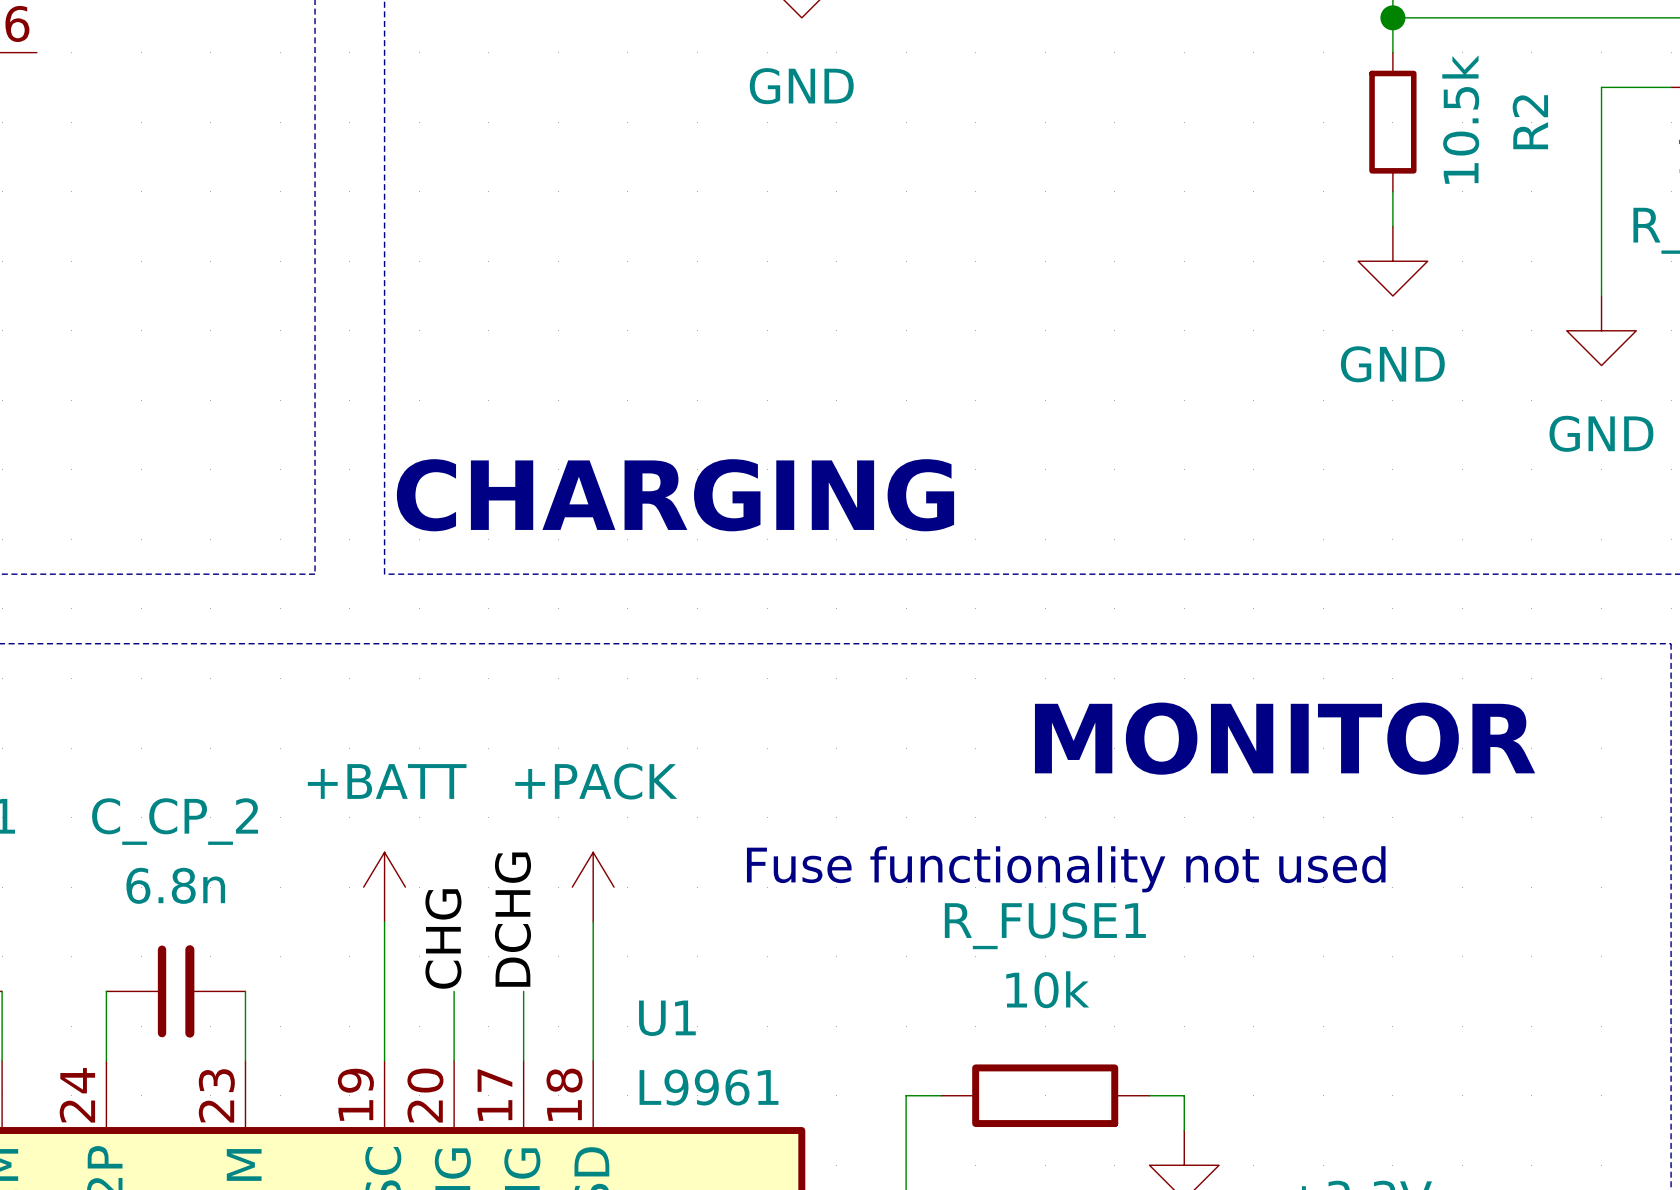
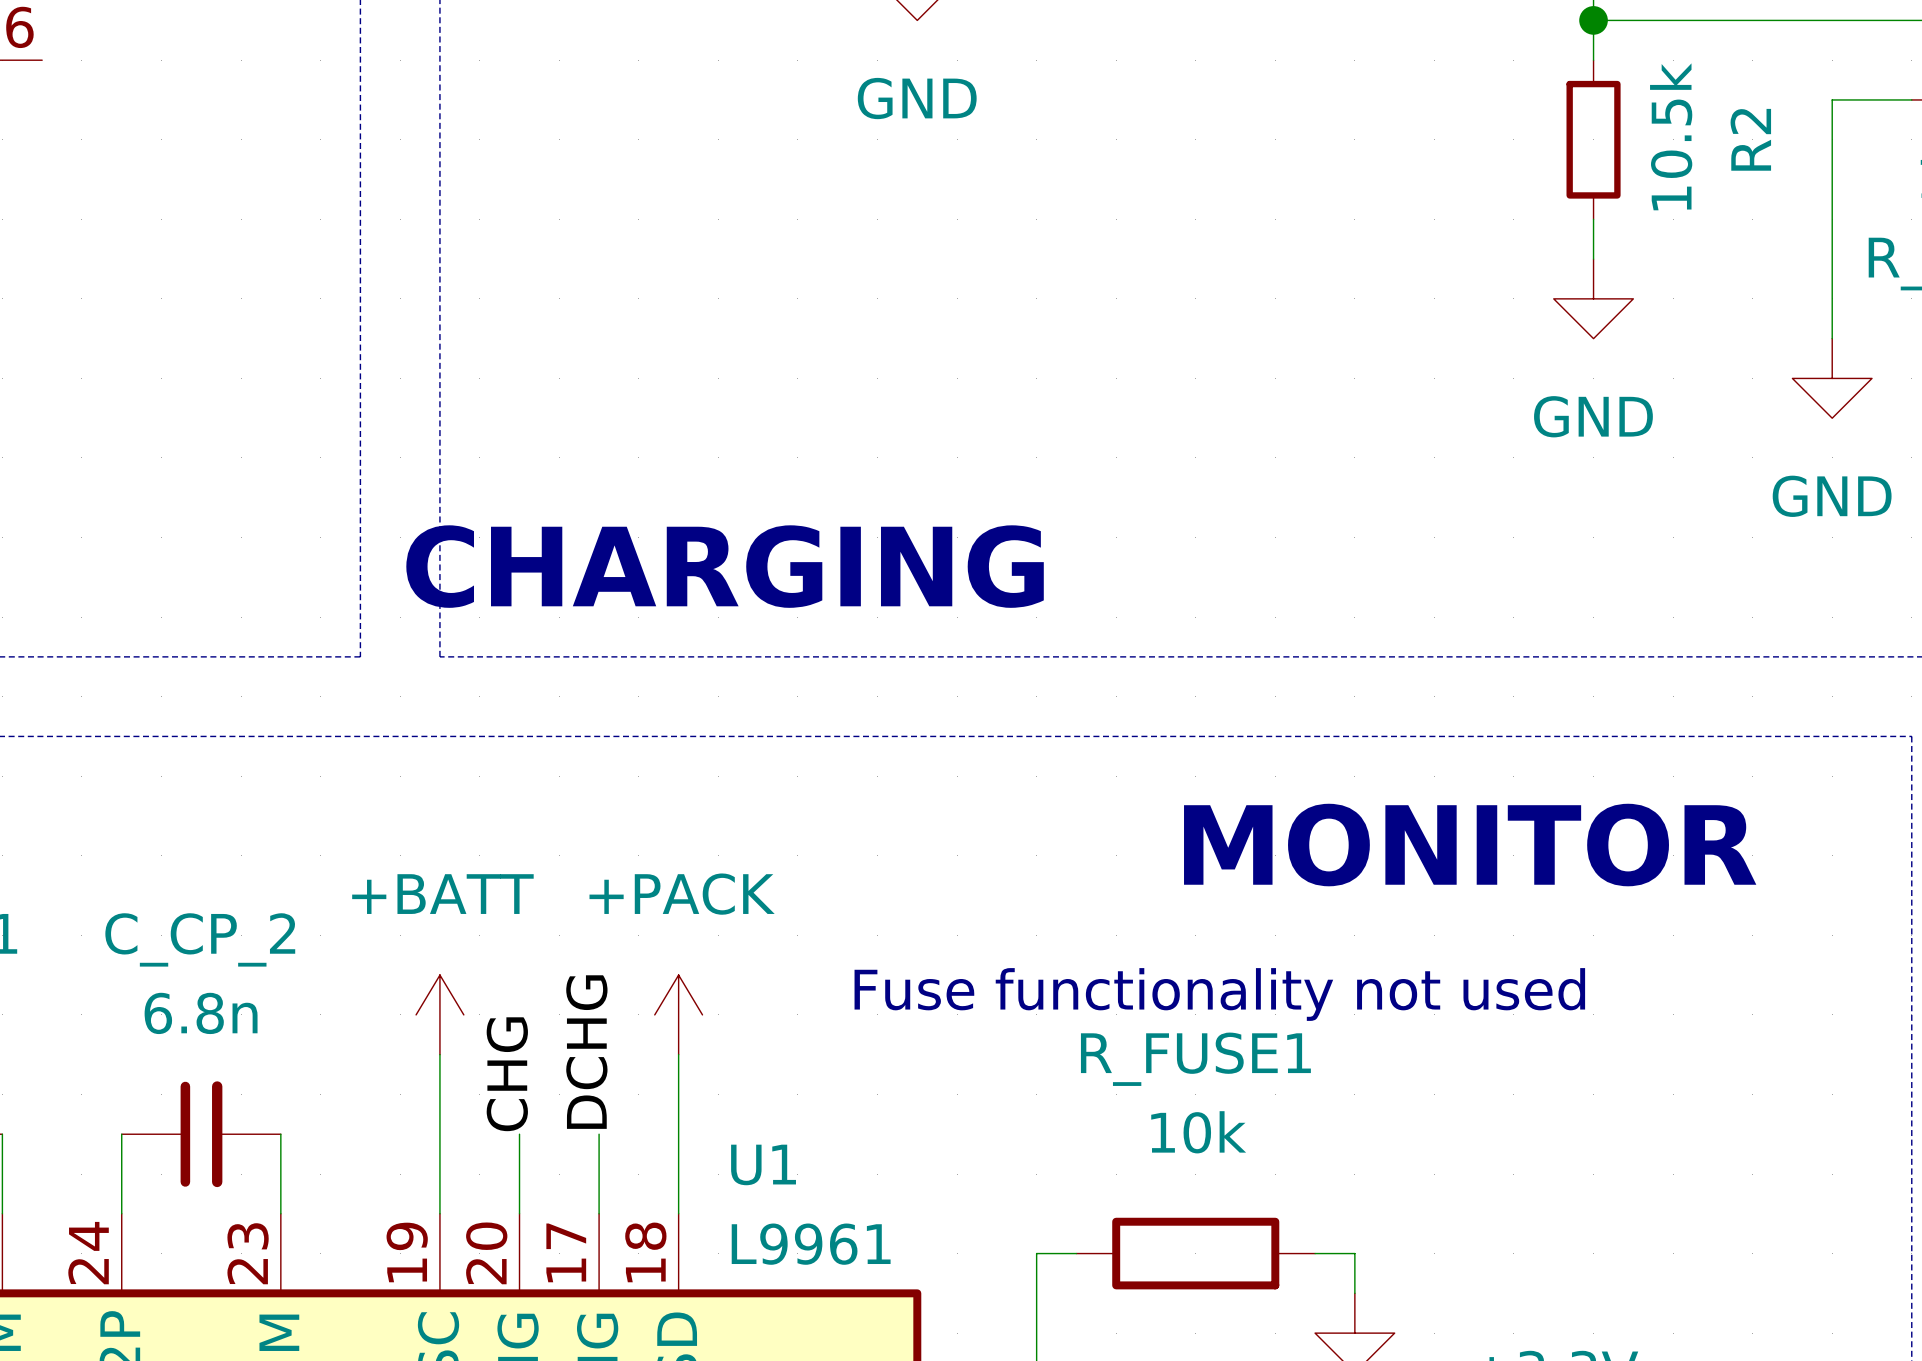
text position: CHARGING (675, 495) -> CHARGING (725, 566)

